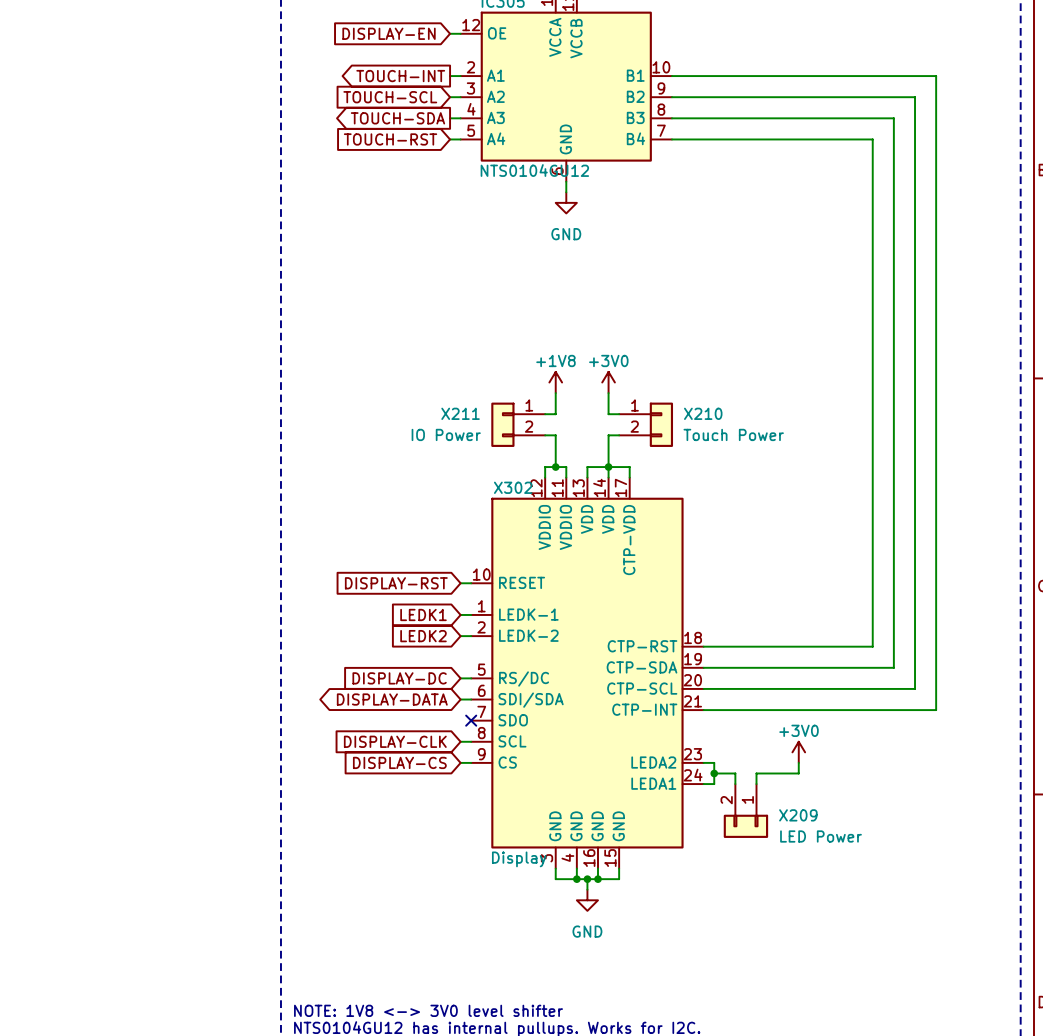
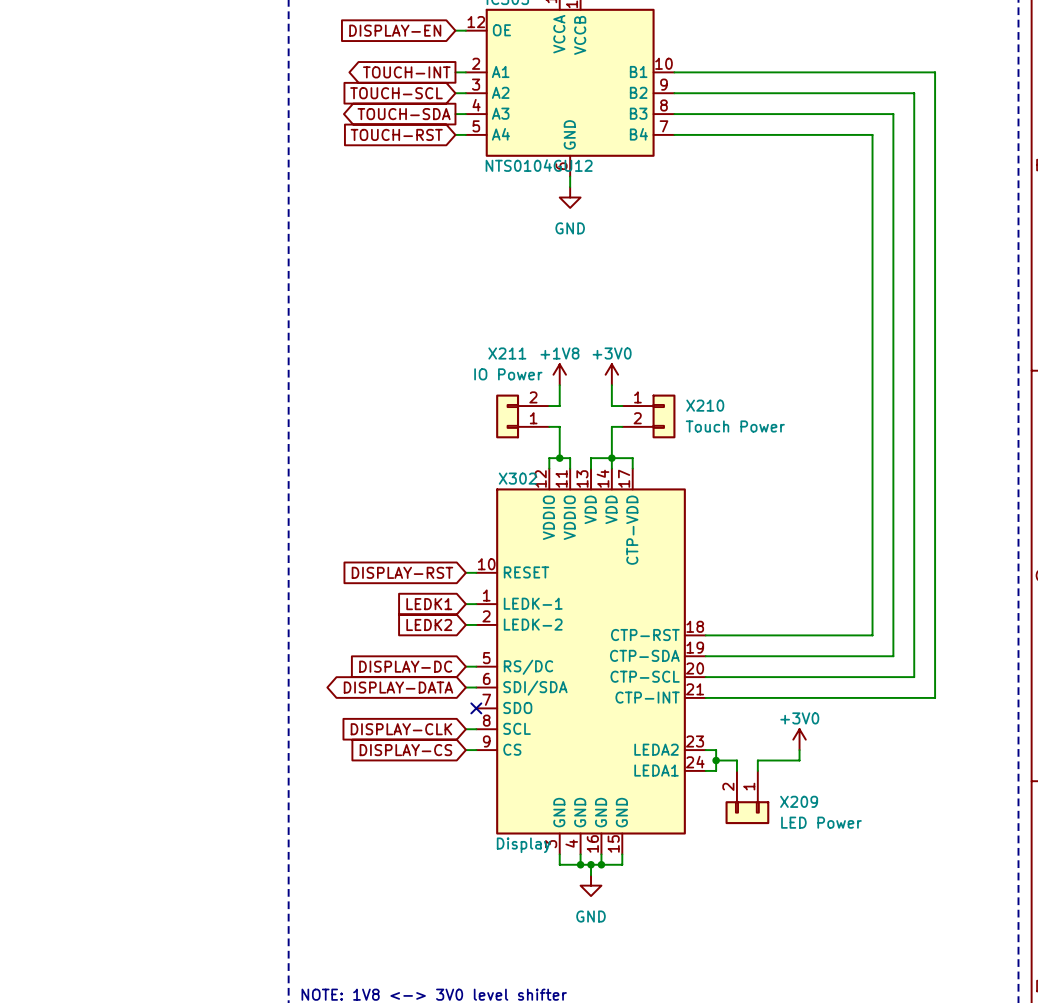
X211 name position: X211 (460, 413) -> X211 (507, 353)
X211 flip: as is (502, 424) -> up-down (507, 416)
X211 value position: IO Power (446, 434) -> IO Power (508, 374)

